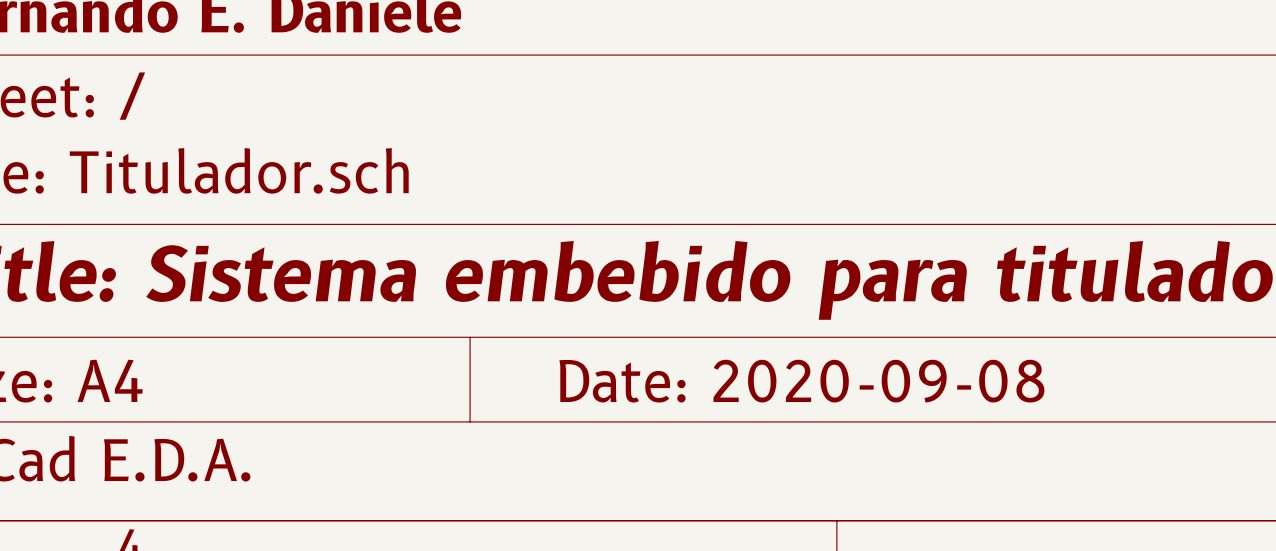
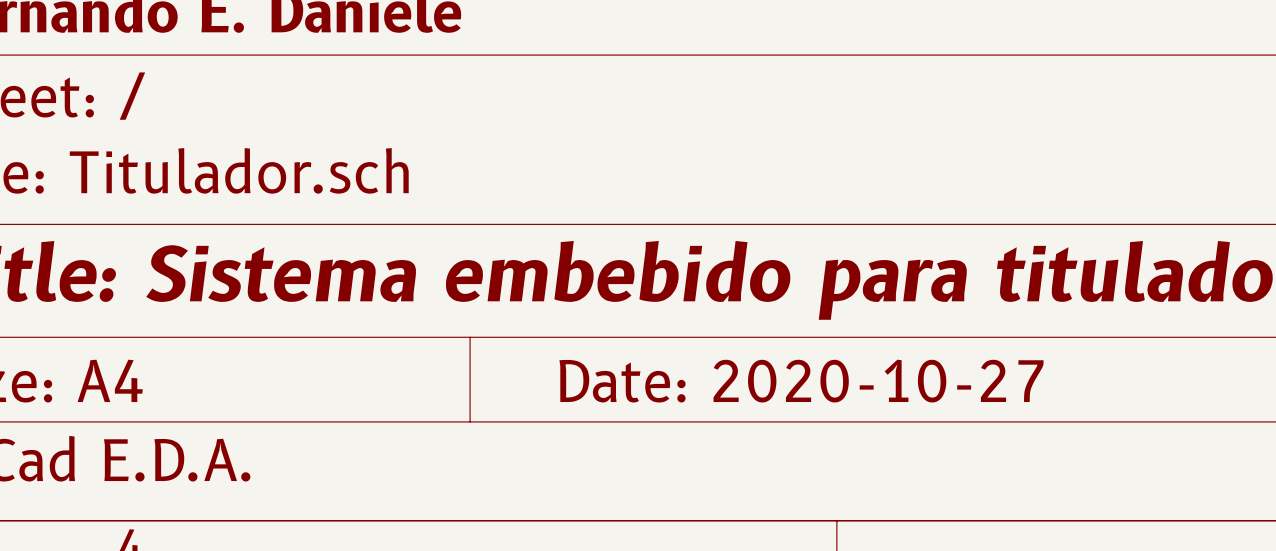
title block: Date: 2020-09-08 (801, 381) -> Date: 2020-10-27 (801, 381)

